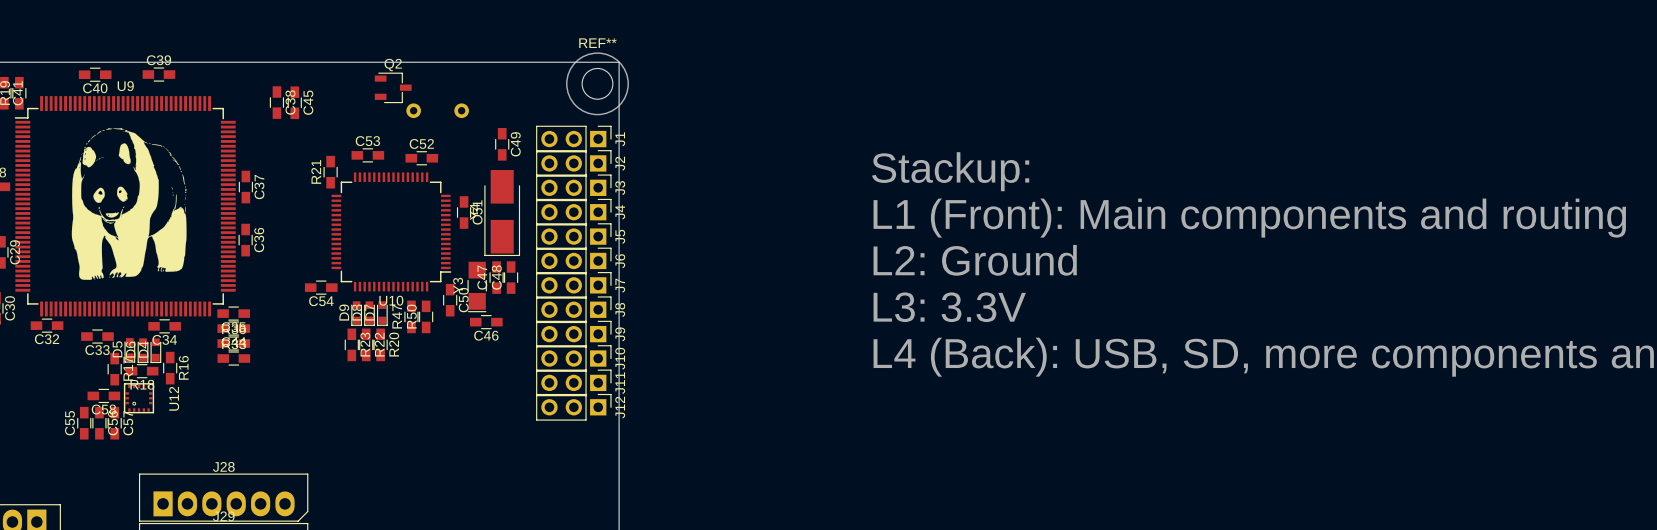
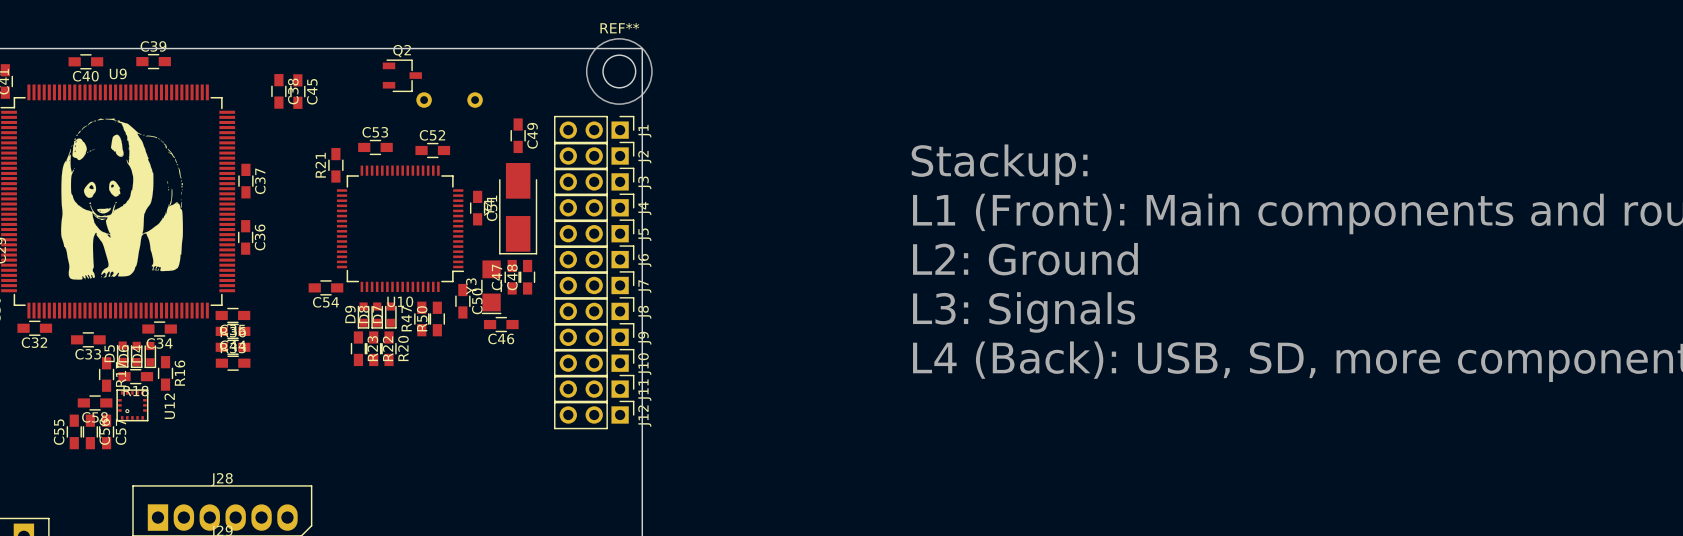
text: L3: 3.3V (949, 307) -> L3: Signals (1024, 312)

